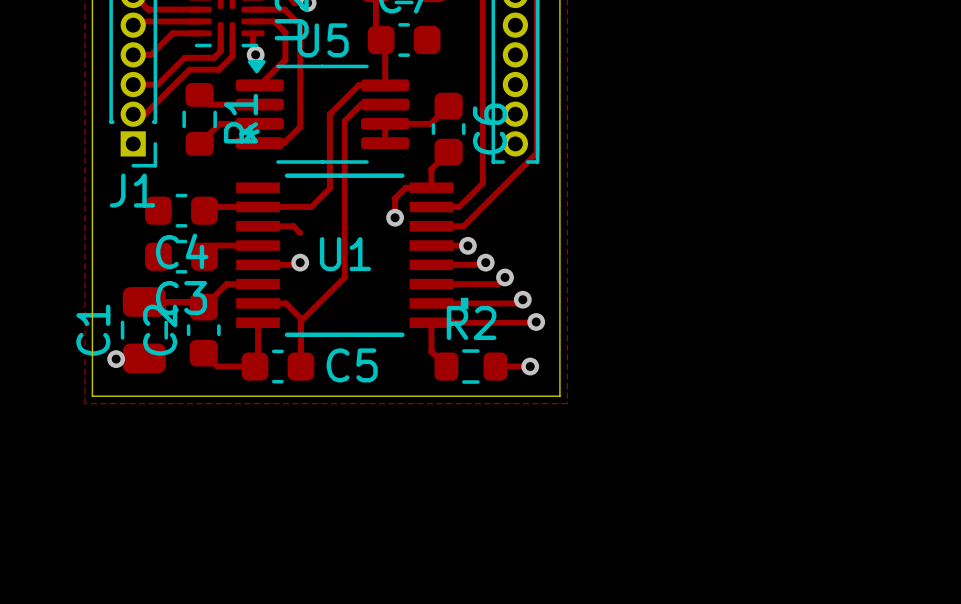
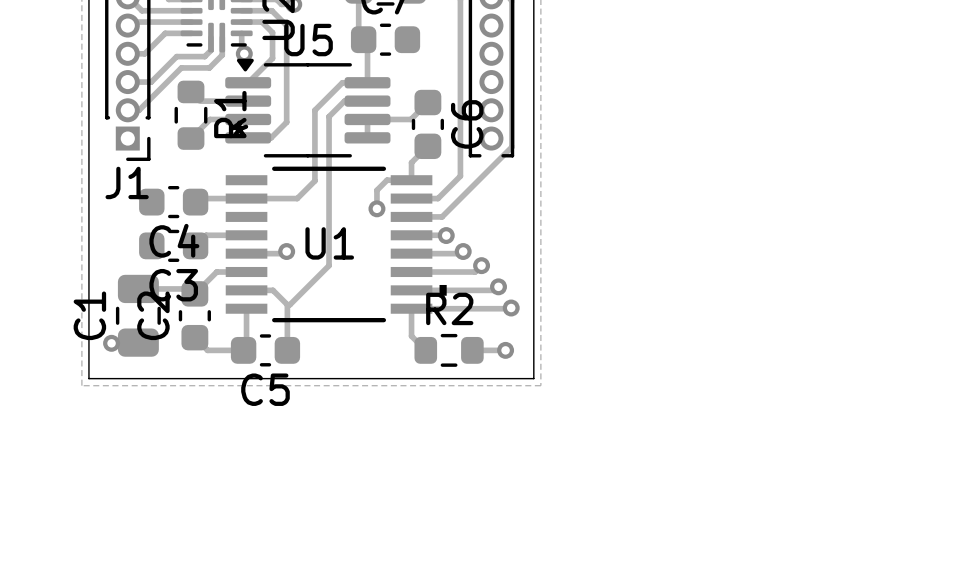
track: (258, 226) (293, 226) (300, 232) -> none
C5 name position: C5 (352, 365) -> C5 (265, 389)

